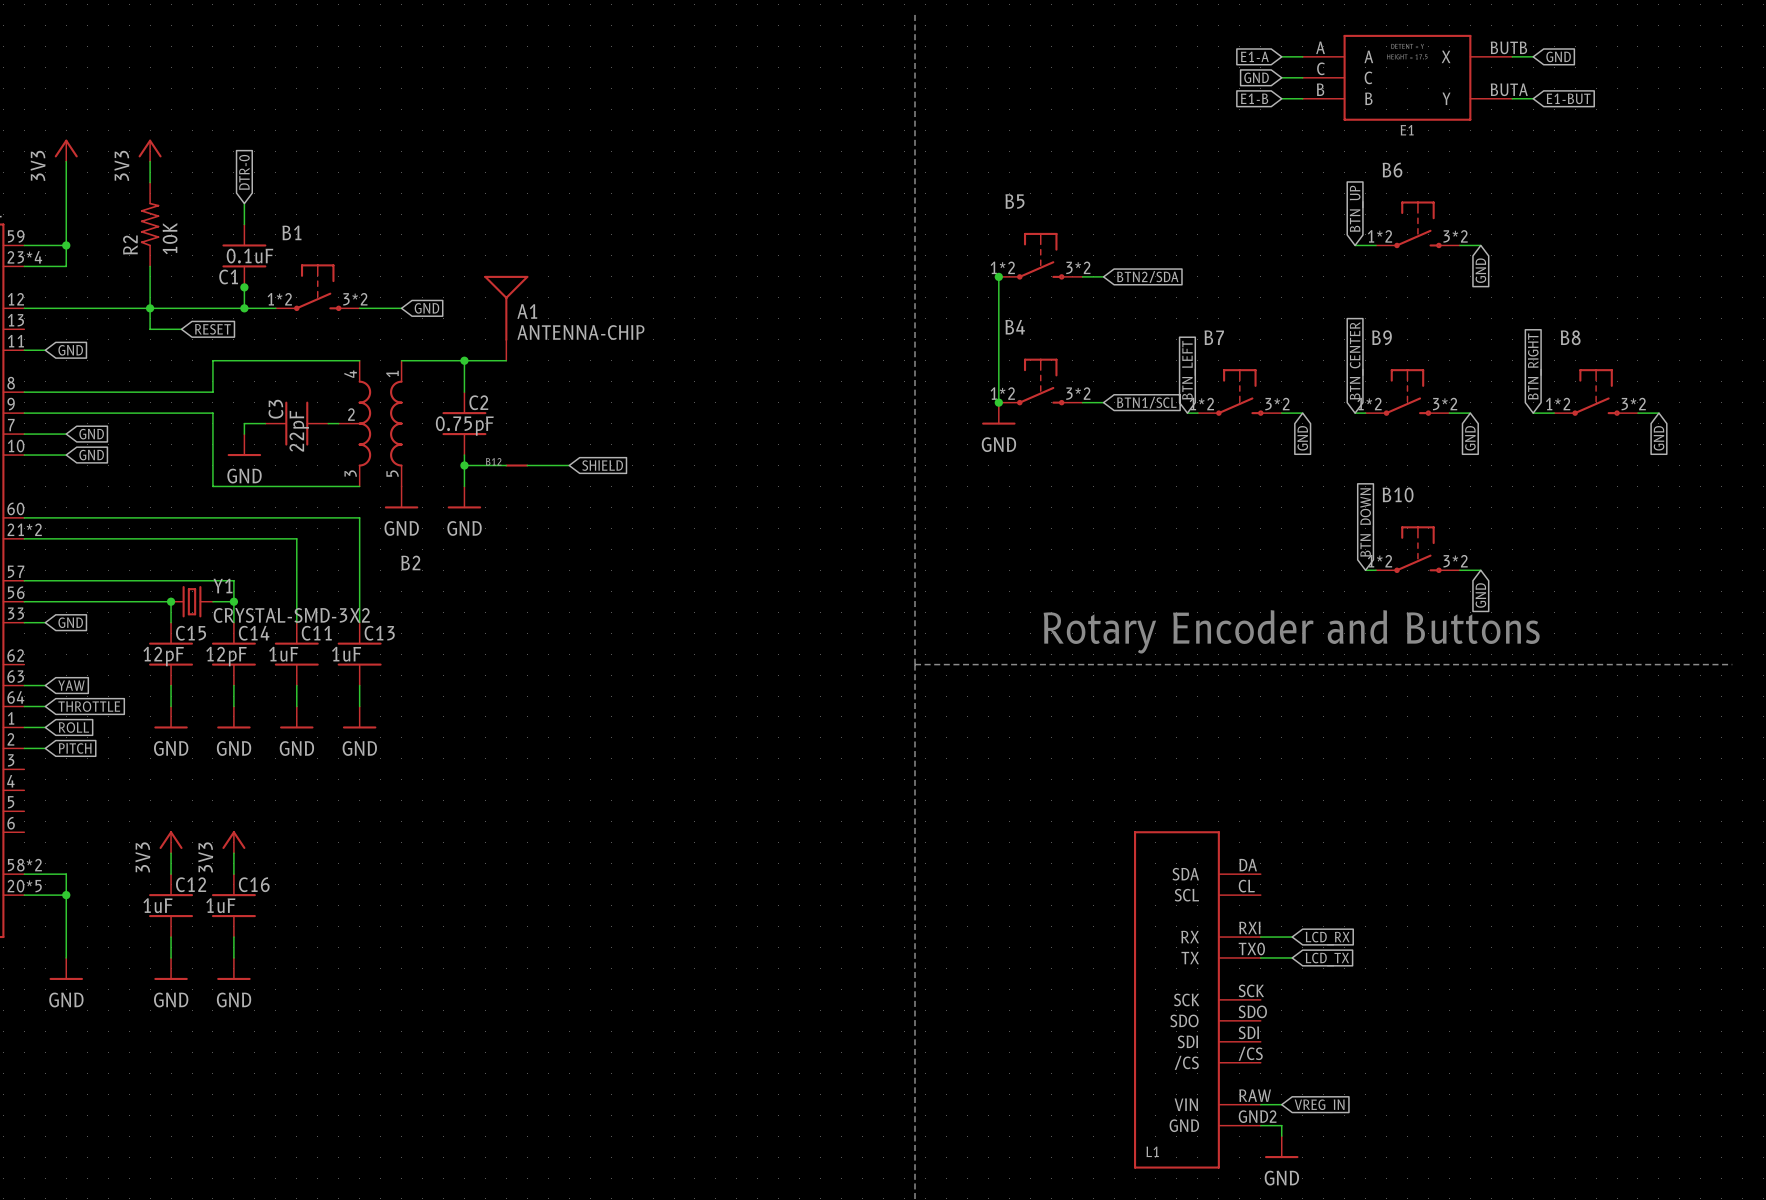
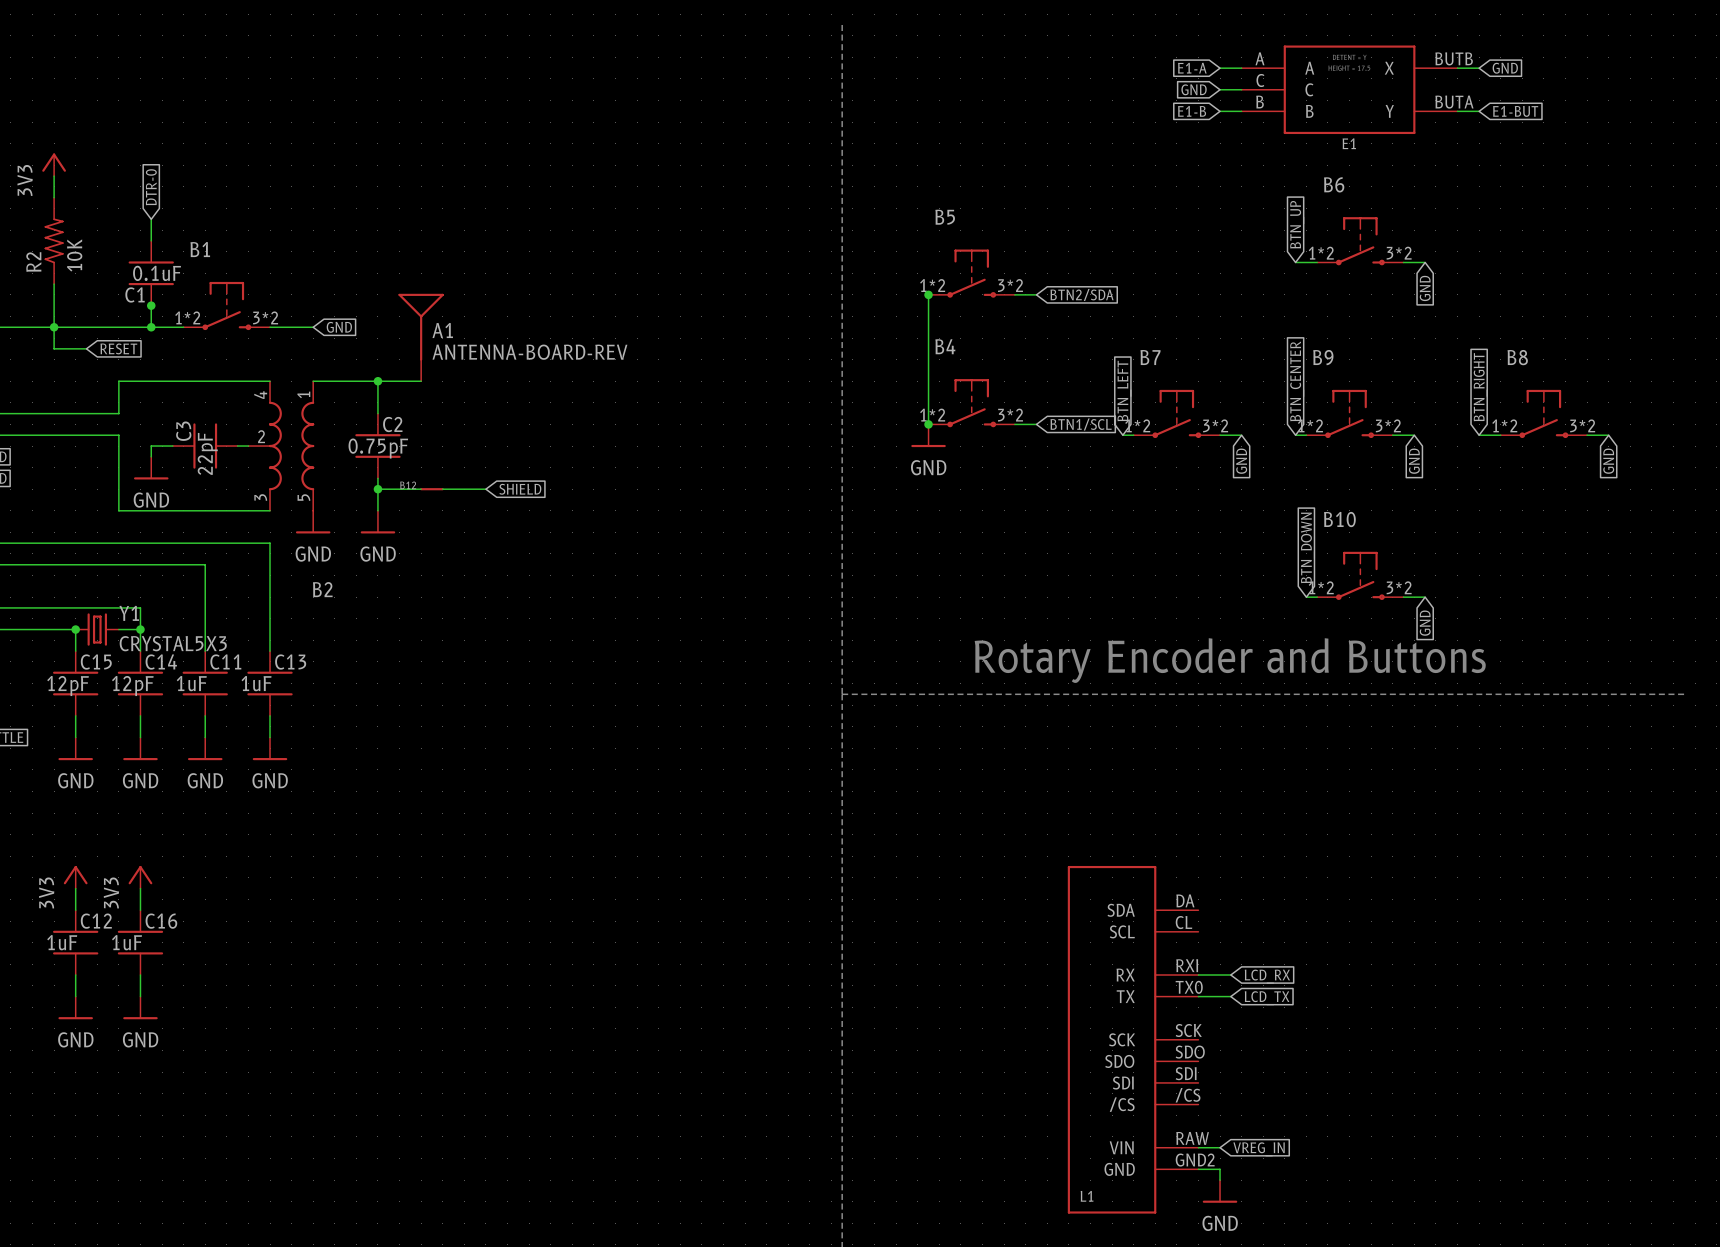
A1 value: ANTENNA-CHIP (580, 332) -> ANTENNA-BOARD-REV (529, 352)
Y1 value: CRYSTAL-SMD-3X2 (291, 615) -> CRYSTAL5X3 (173, 643)

